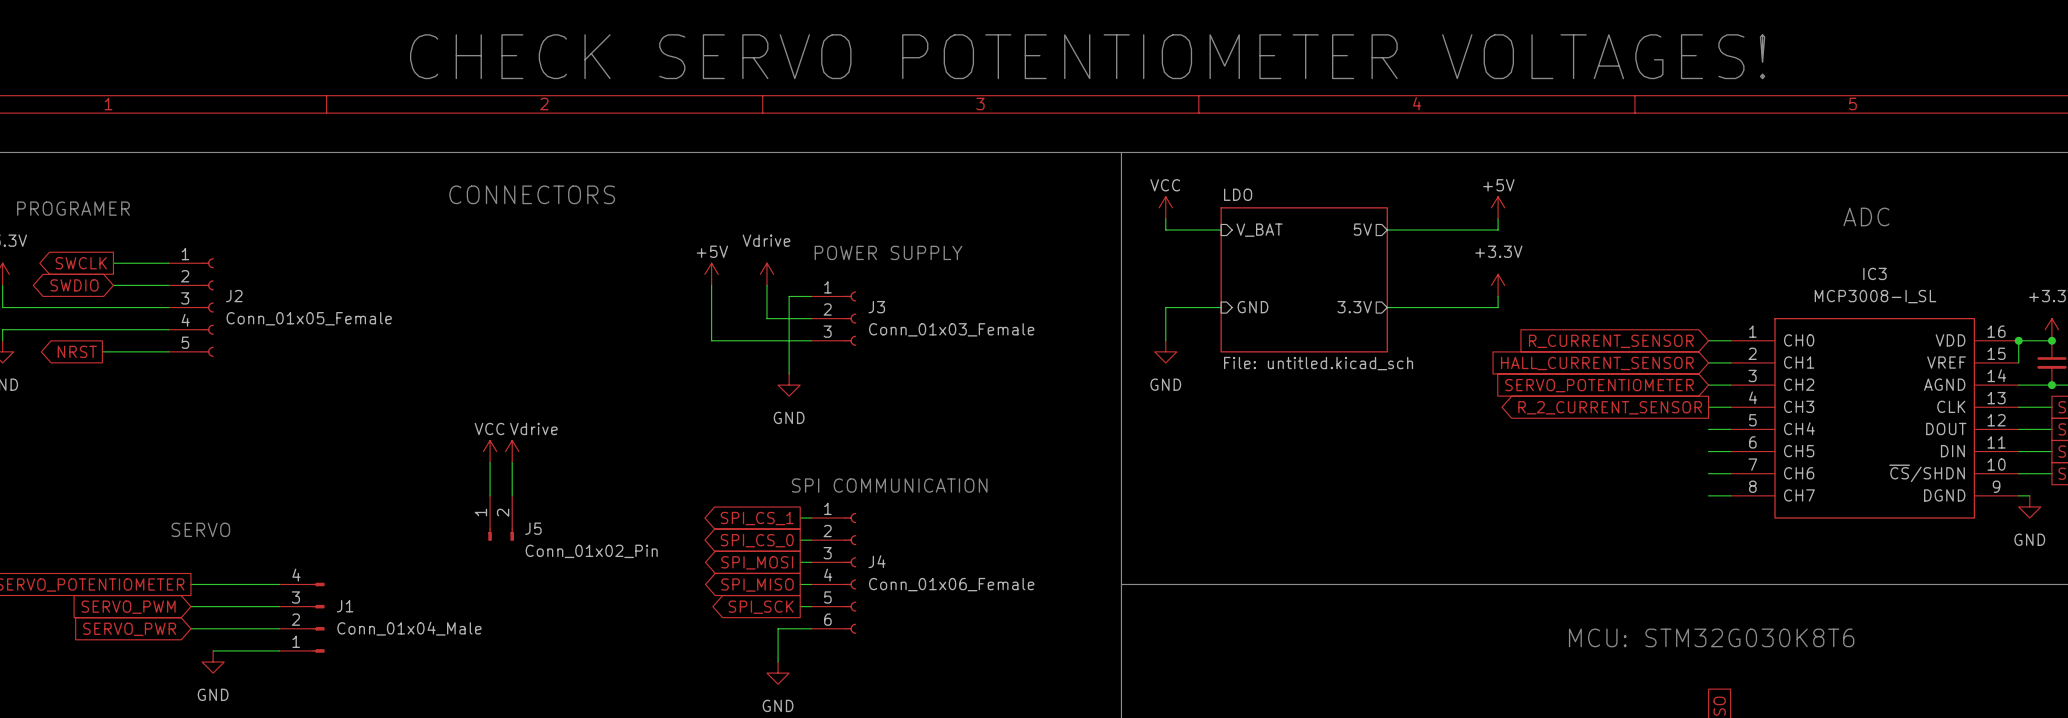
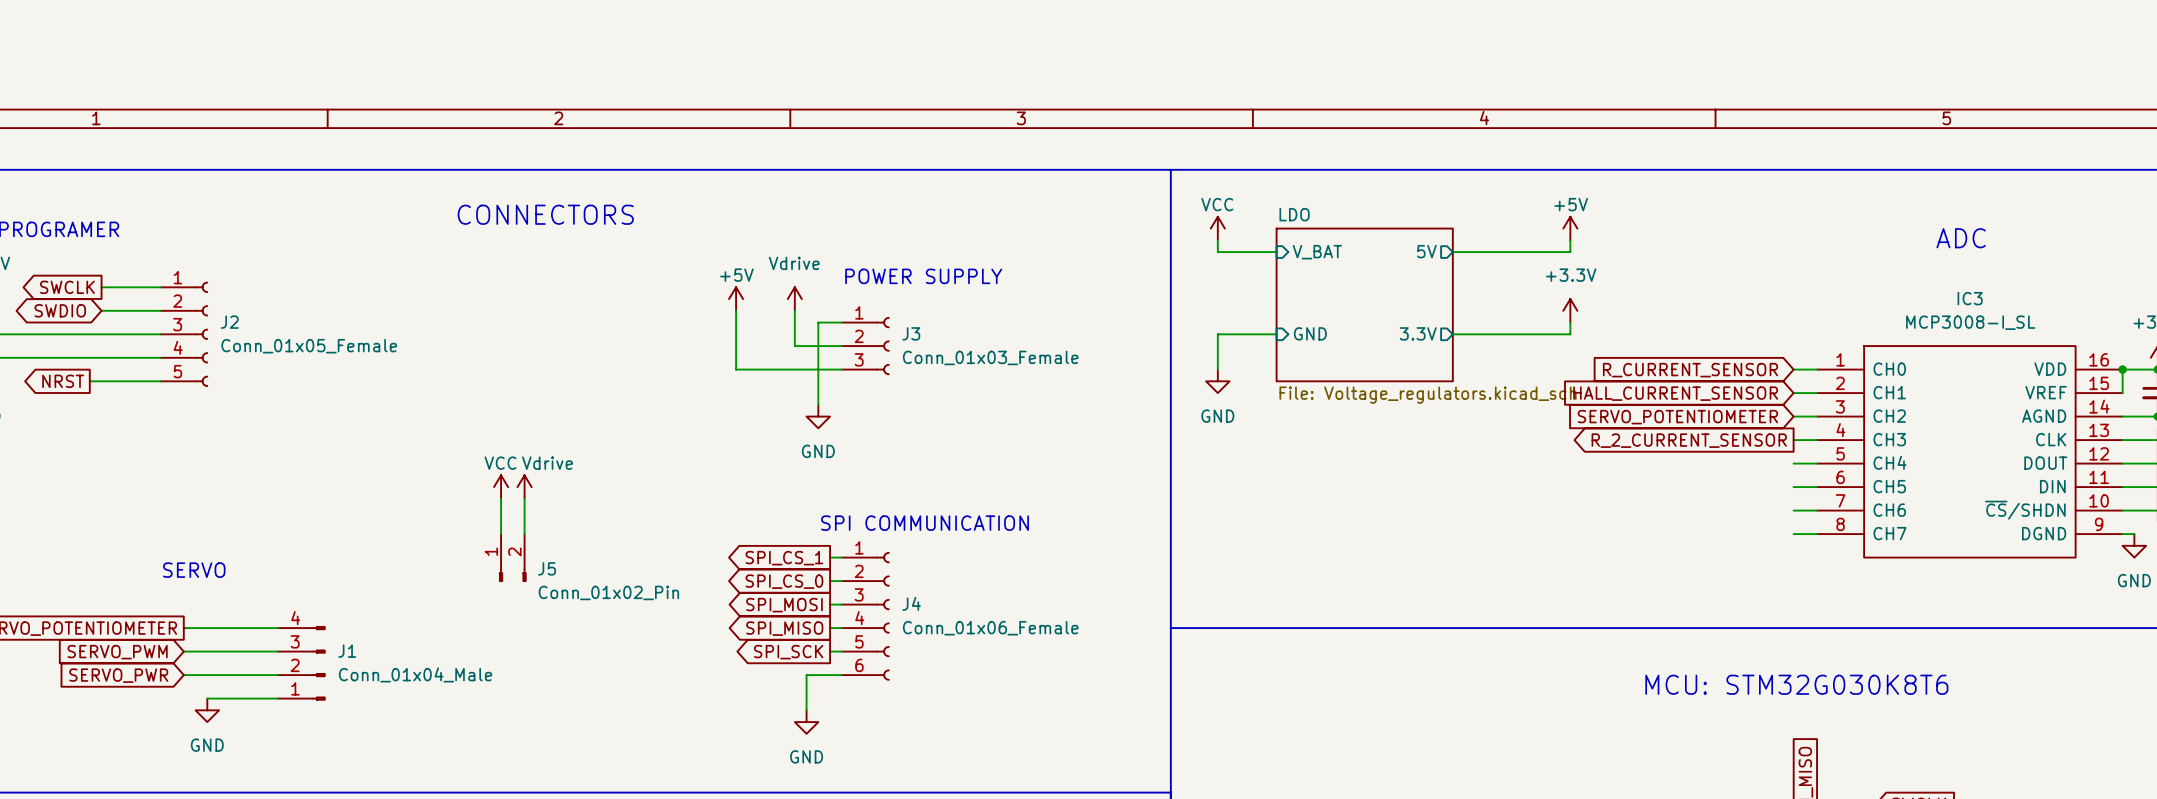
text: CHECK SERVO POTENTIOMETER VOLTAGES! (1087, 56) -> none
sheet LDO value: File: untitled.kicad_sch (1318, 363) -> File: Voltage_regulators.kicad_sch (1428, 395)

